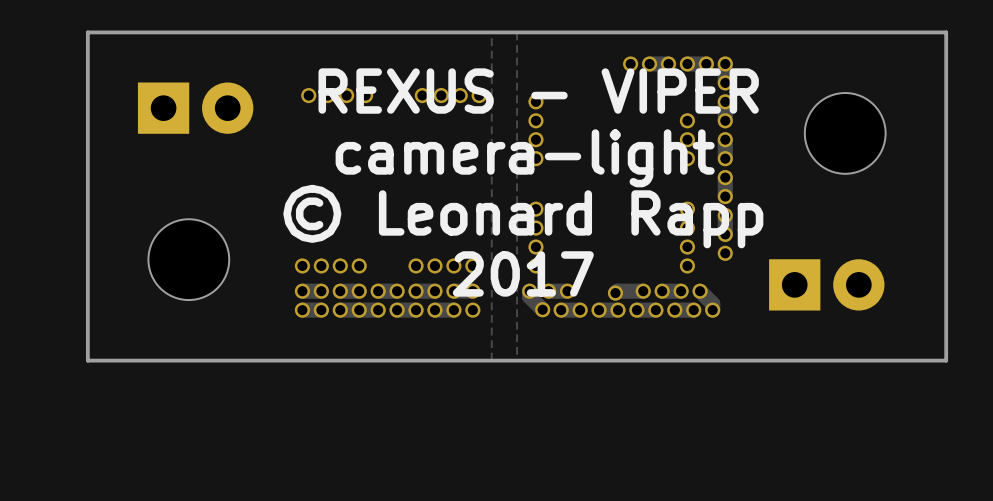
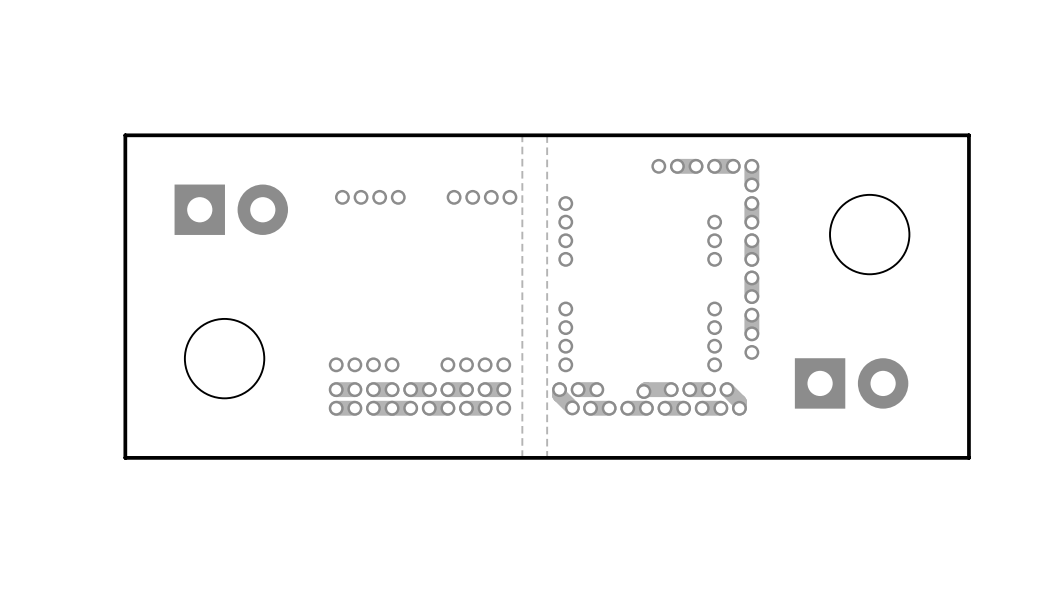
text: REXUS - VIPER (538, 91) -> none
text: camera-light (525, 158) -> none
text: © Leonard Rapp (523, 216) -> none
text: 2017 (523, 273) -> none

